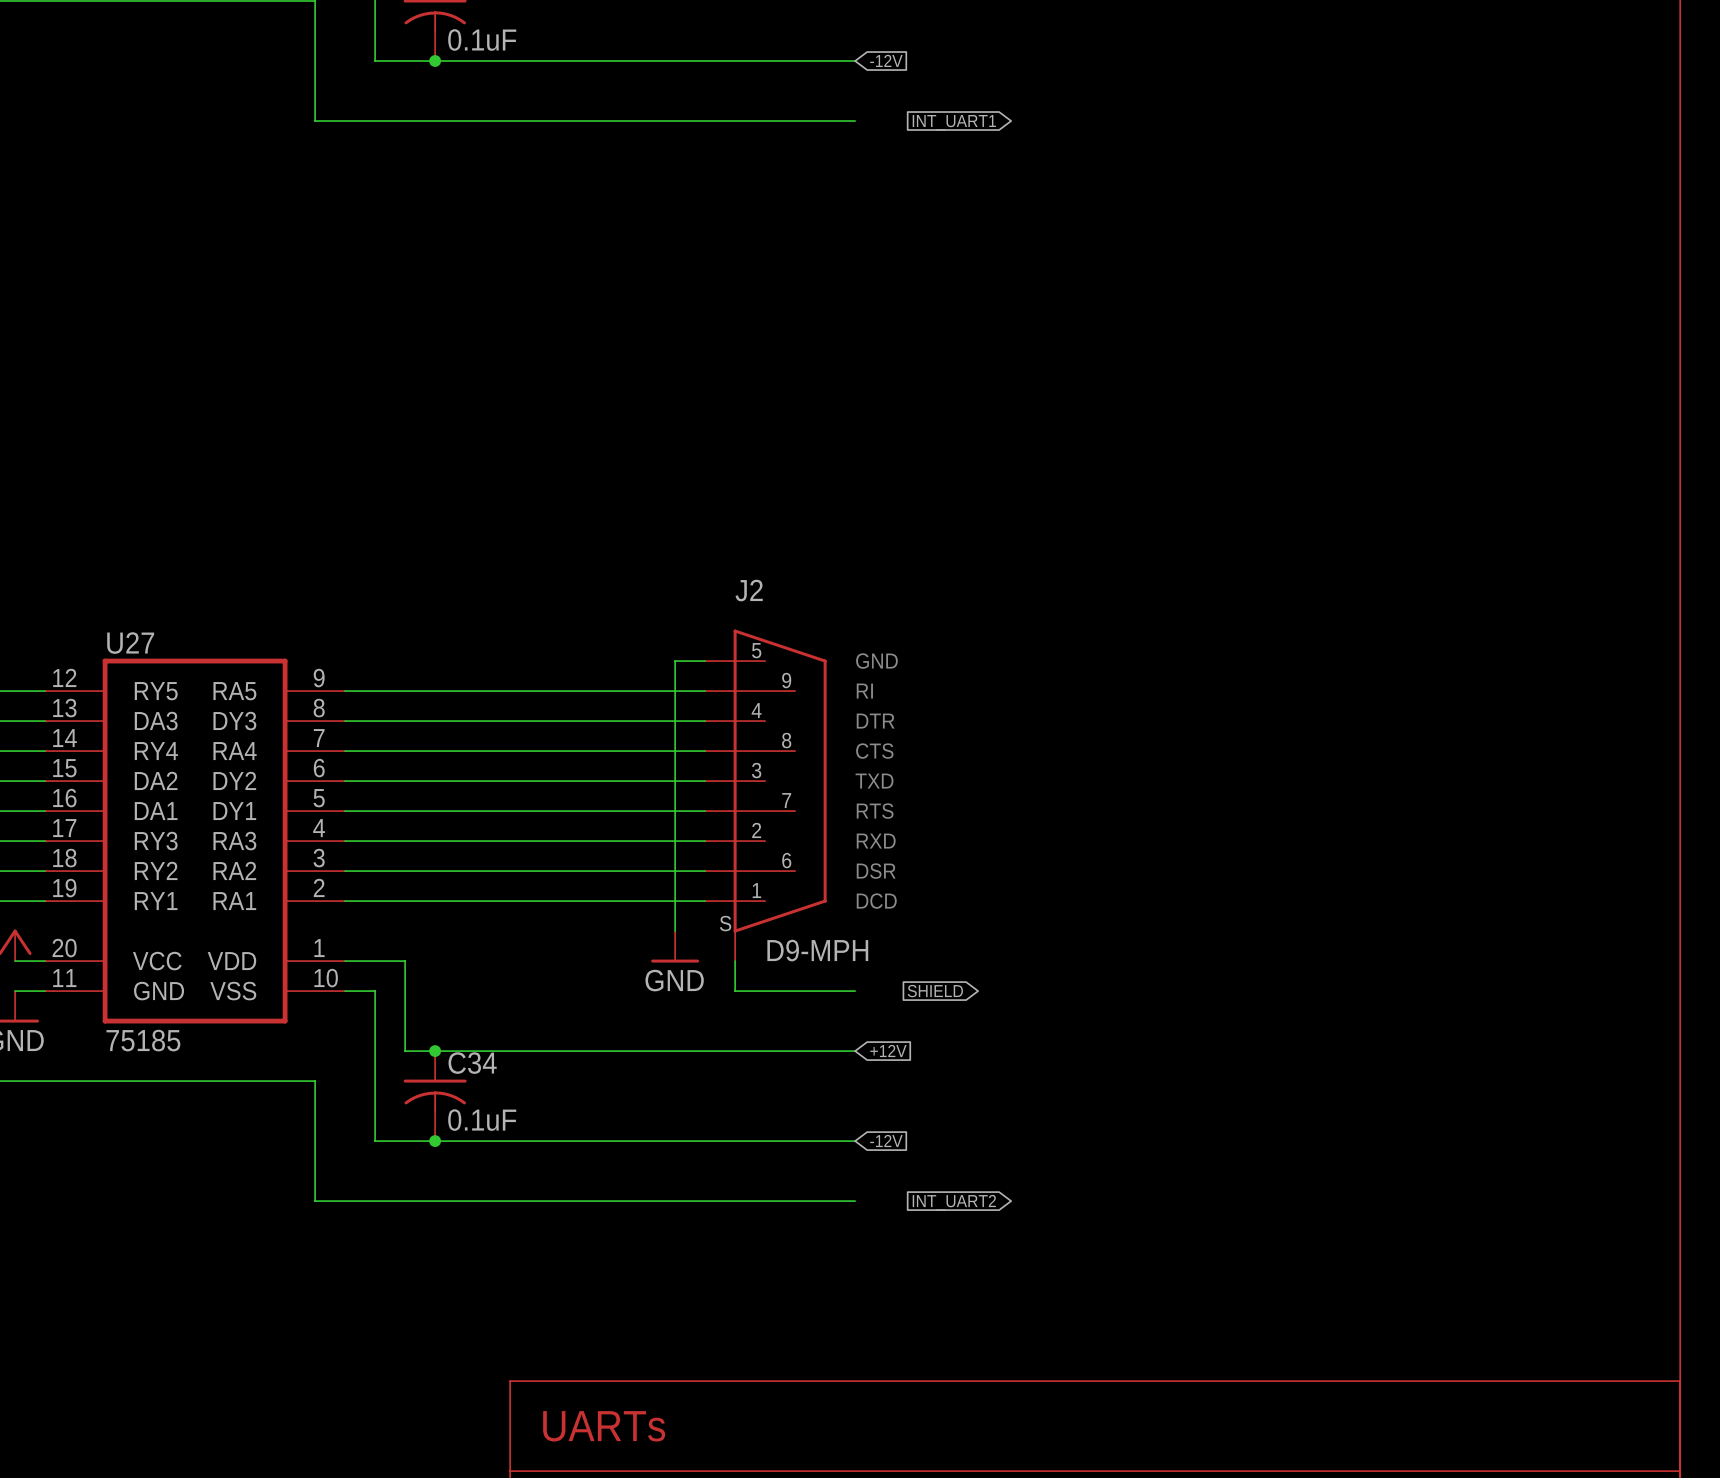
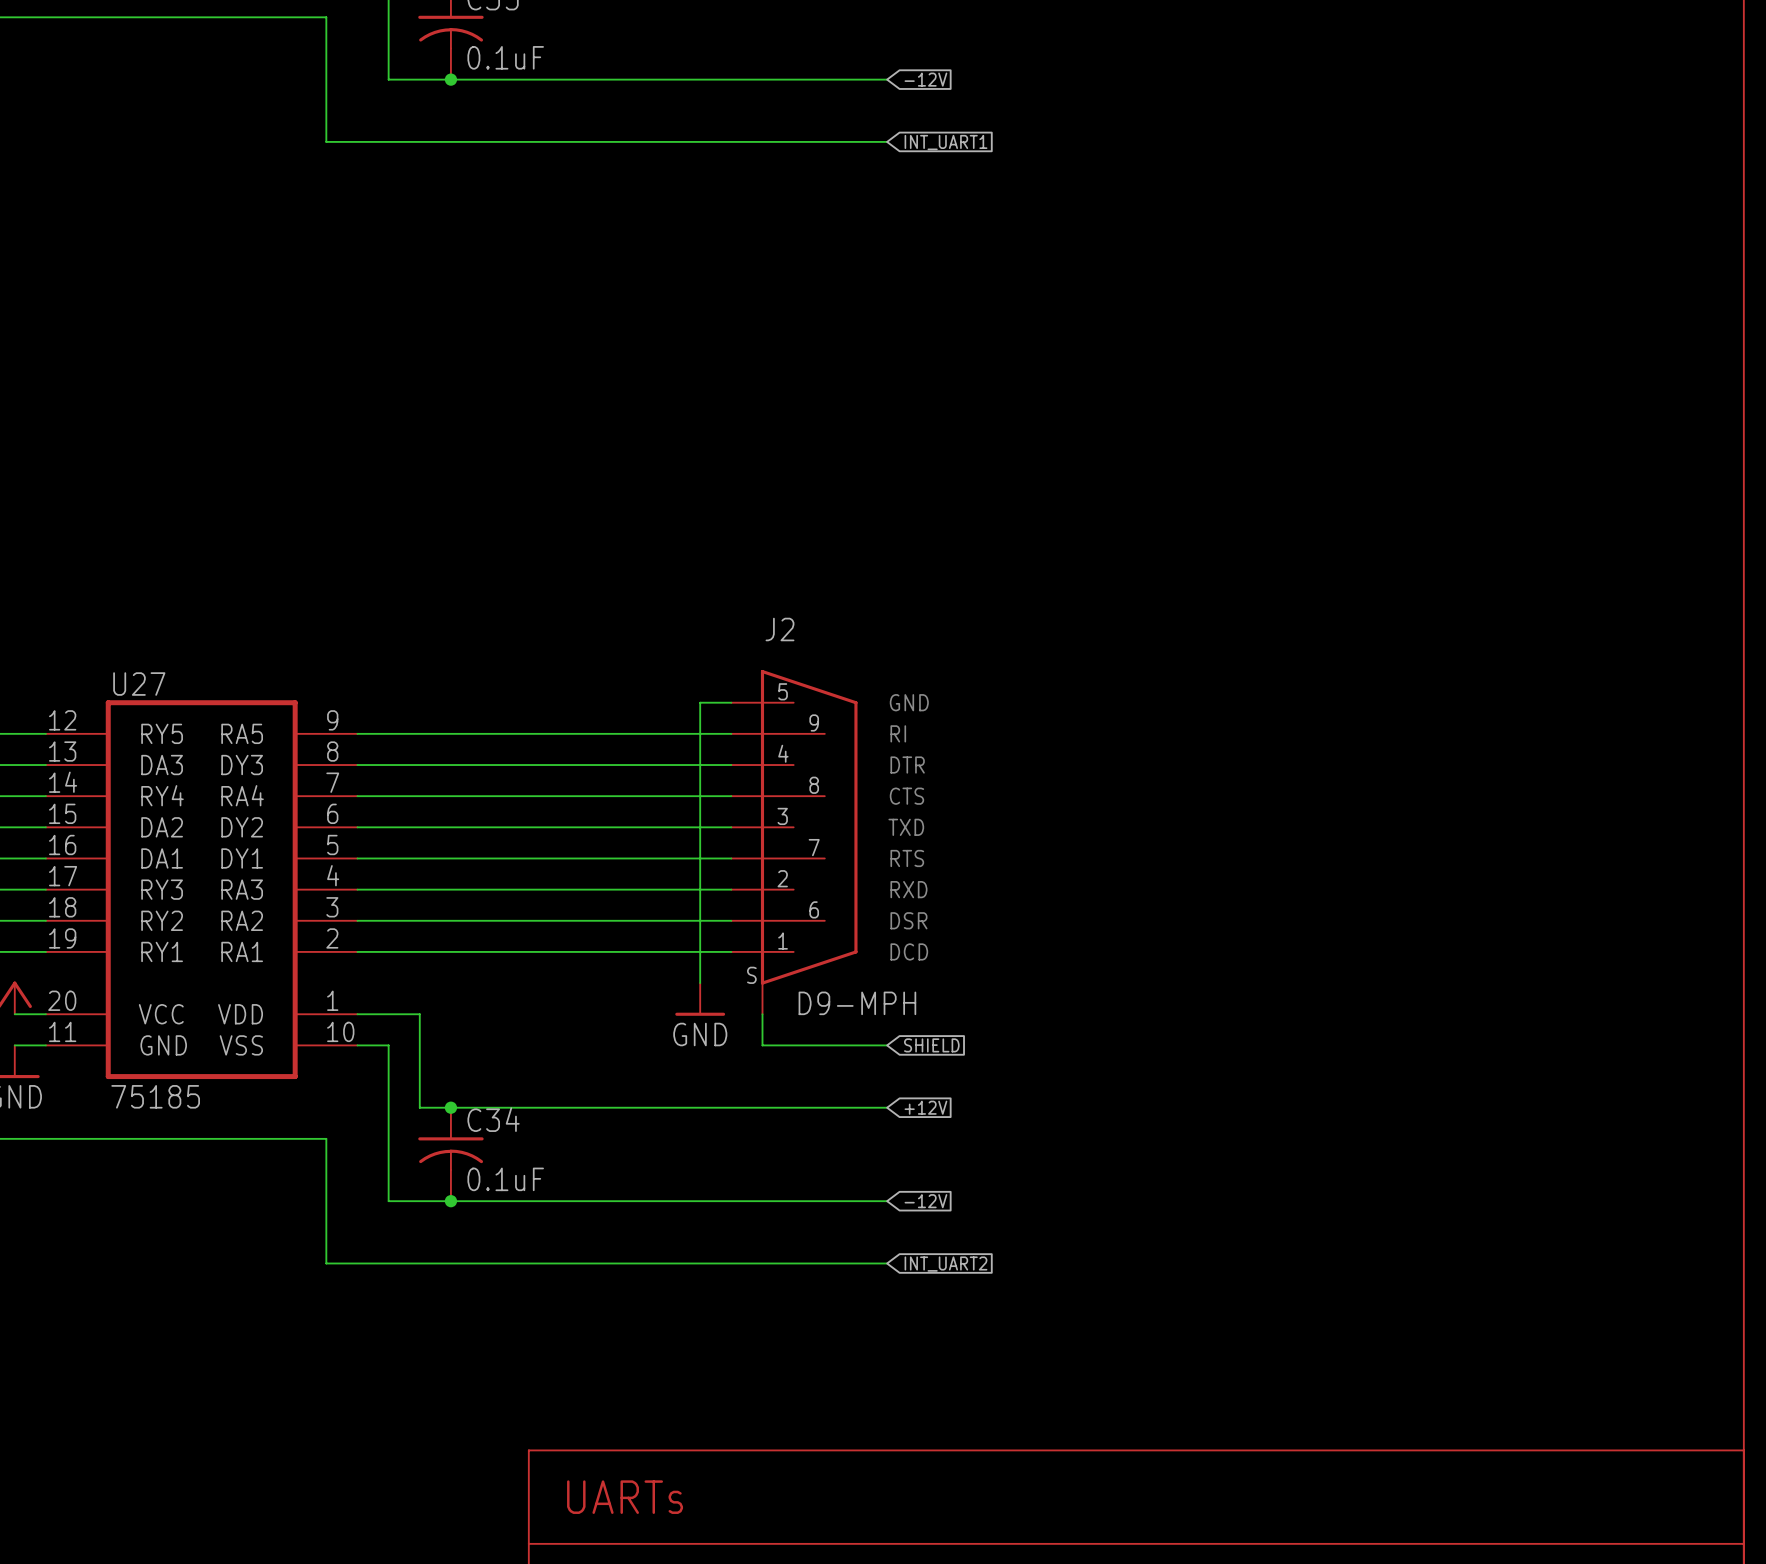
global label rotation: 0° (954, 122) -> 180° (945, 142)
global label rotation: 0° (935, 991) -> 180° (931, 1045)
global label rotation: 0° (954, 1202) -> 180° (945, 1264)

